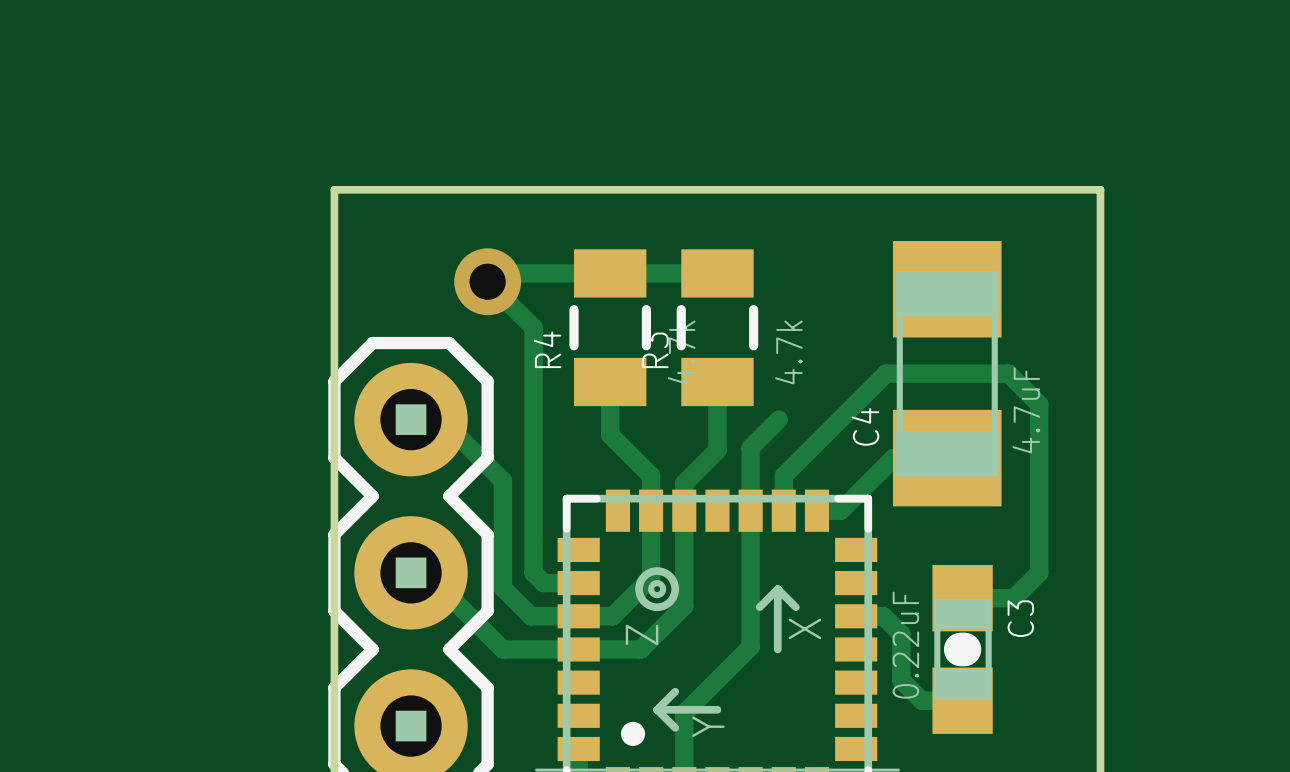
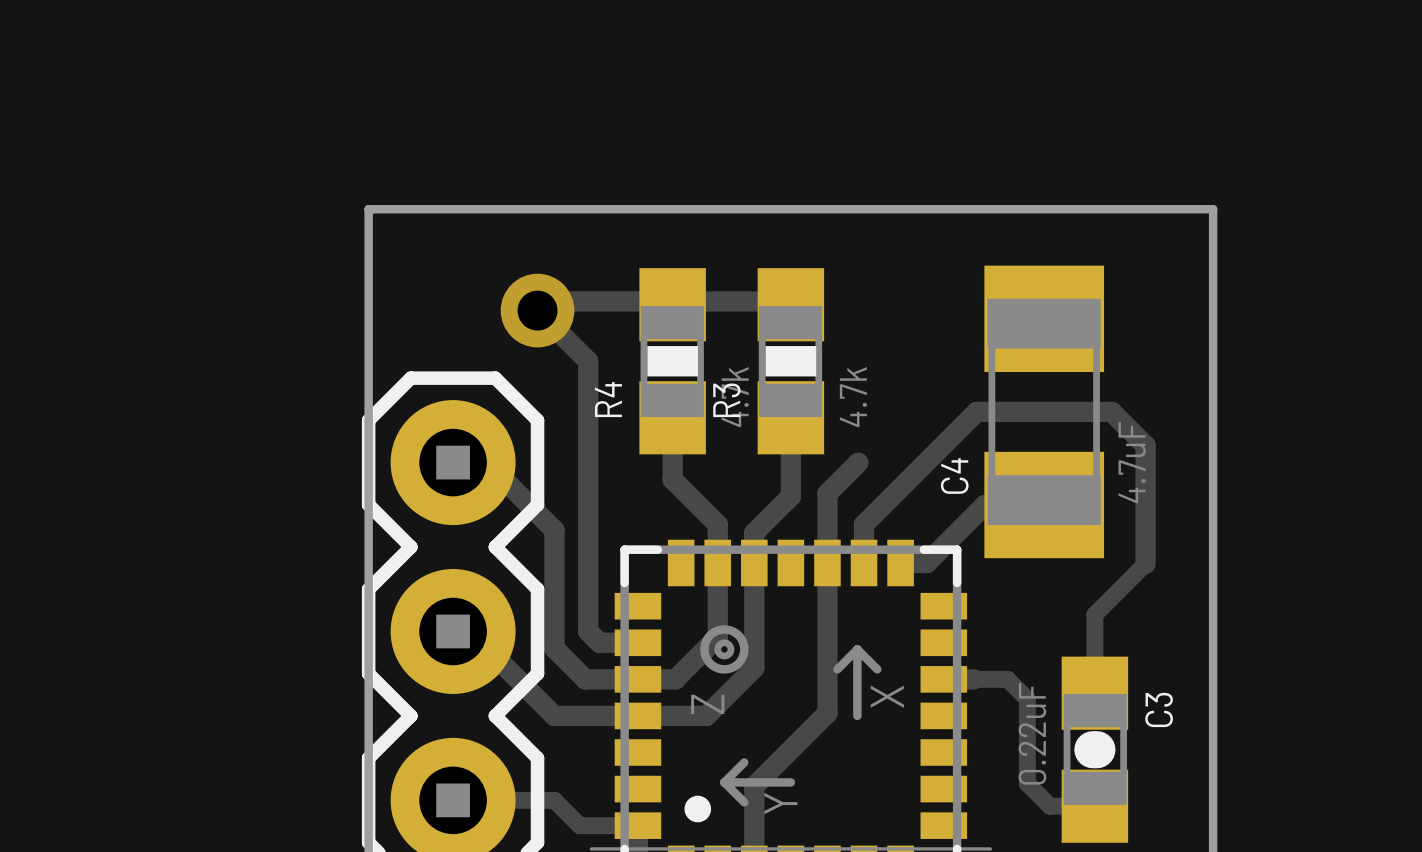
R4 footprint: [569, 249, 651, 407] -> [639, 268, 706, 455]
R3 footprint: [676, 249, 759, 407] -> [757, 268, 825, 455]
track: (1039, 511) (1039, 572) (1013, 598) (962, 598) -> (1145, 563) (1094, 614) (1094, 693)
track: (883, 616) (901, 634) (901, 680) (921, 700) (962, 700) -> (973, 679) (1007, 679) (1027, 699) (1027, 783) (1050, 806) (1094, 806)
C3 position: (962, 649) -> (1094, 749)
track: none -> (453, 800) (554, 800) (579, 825) (638, 825) (638, 834)

